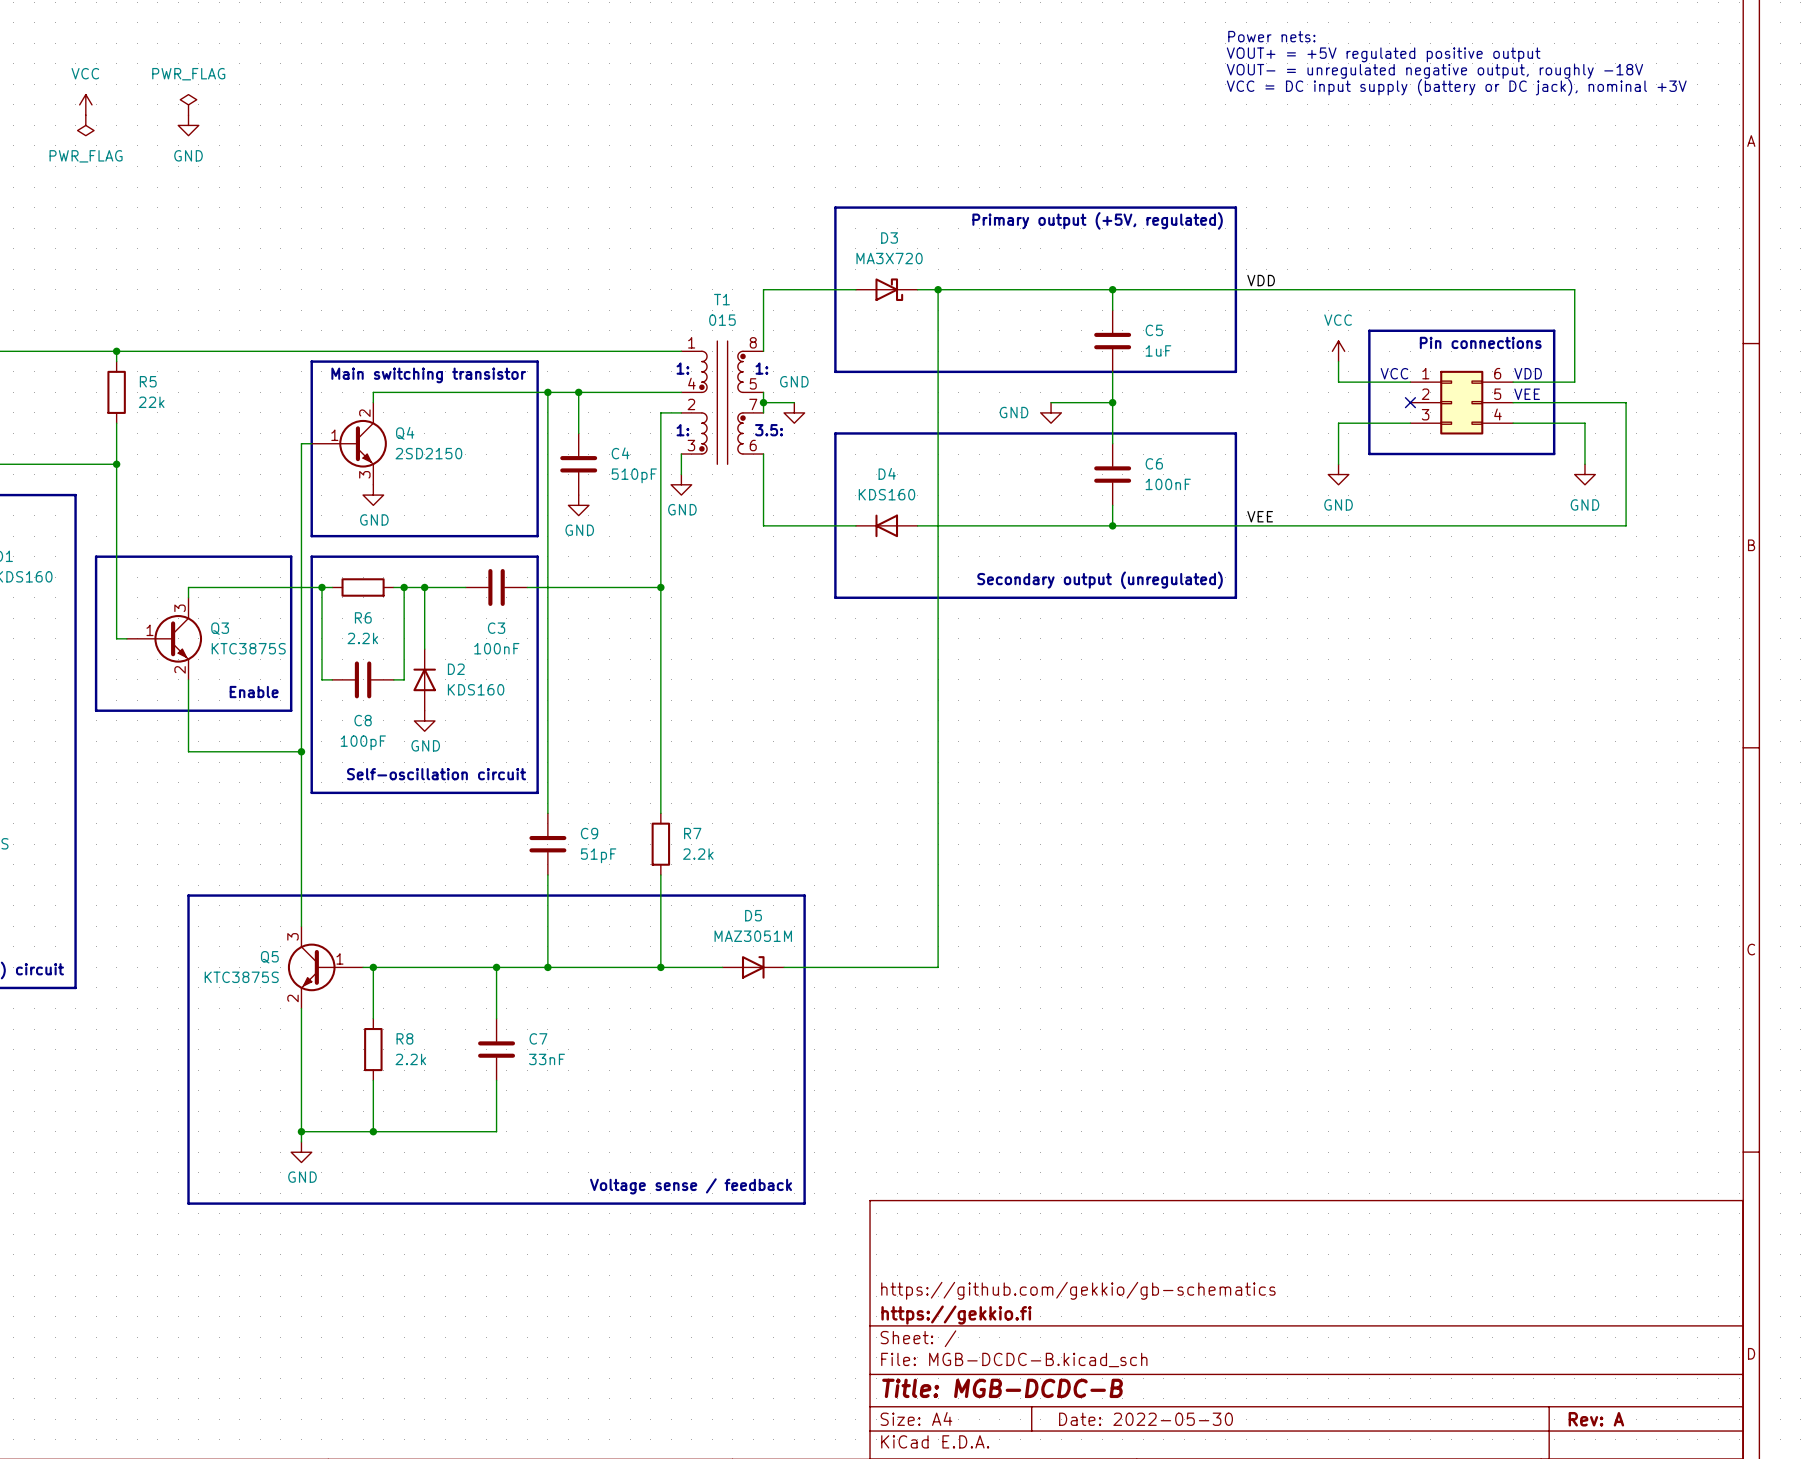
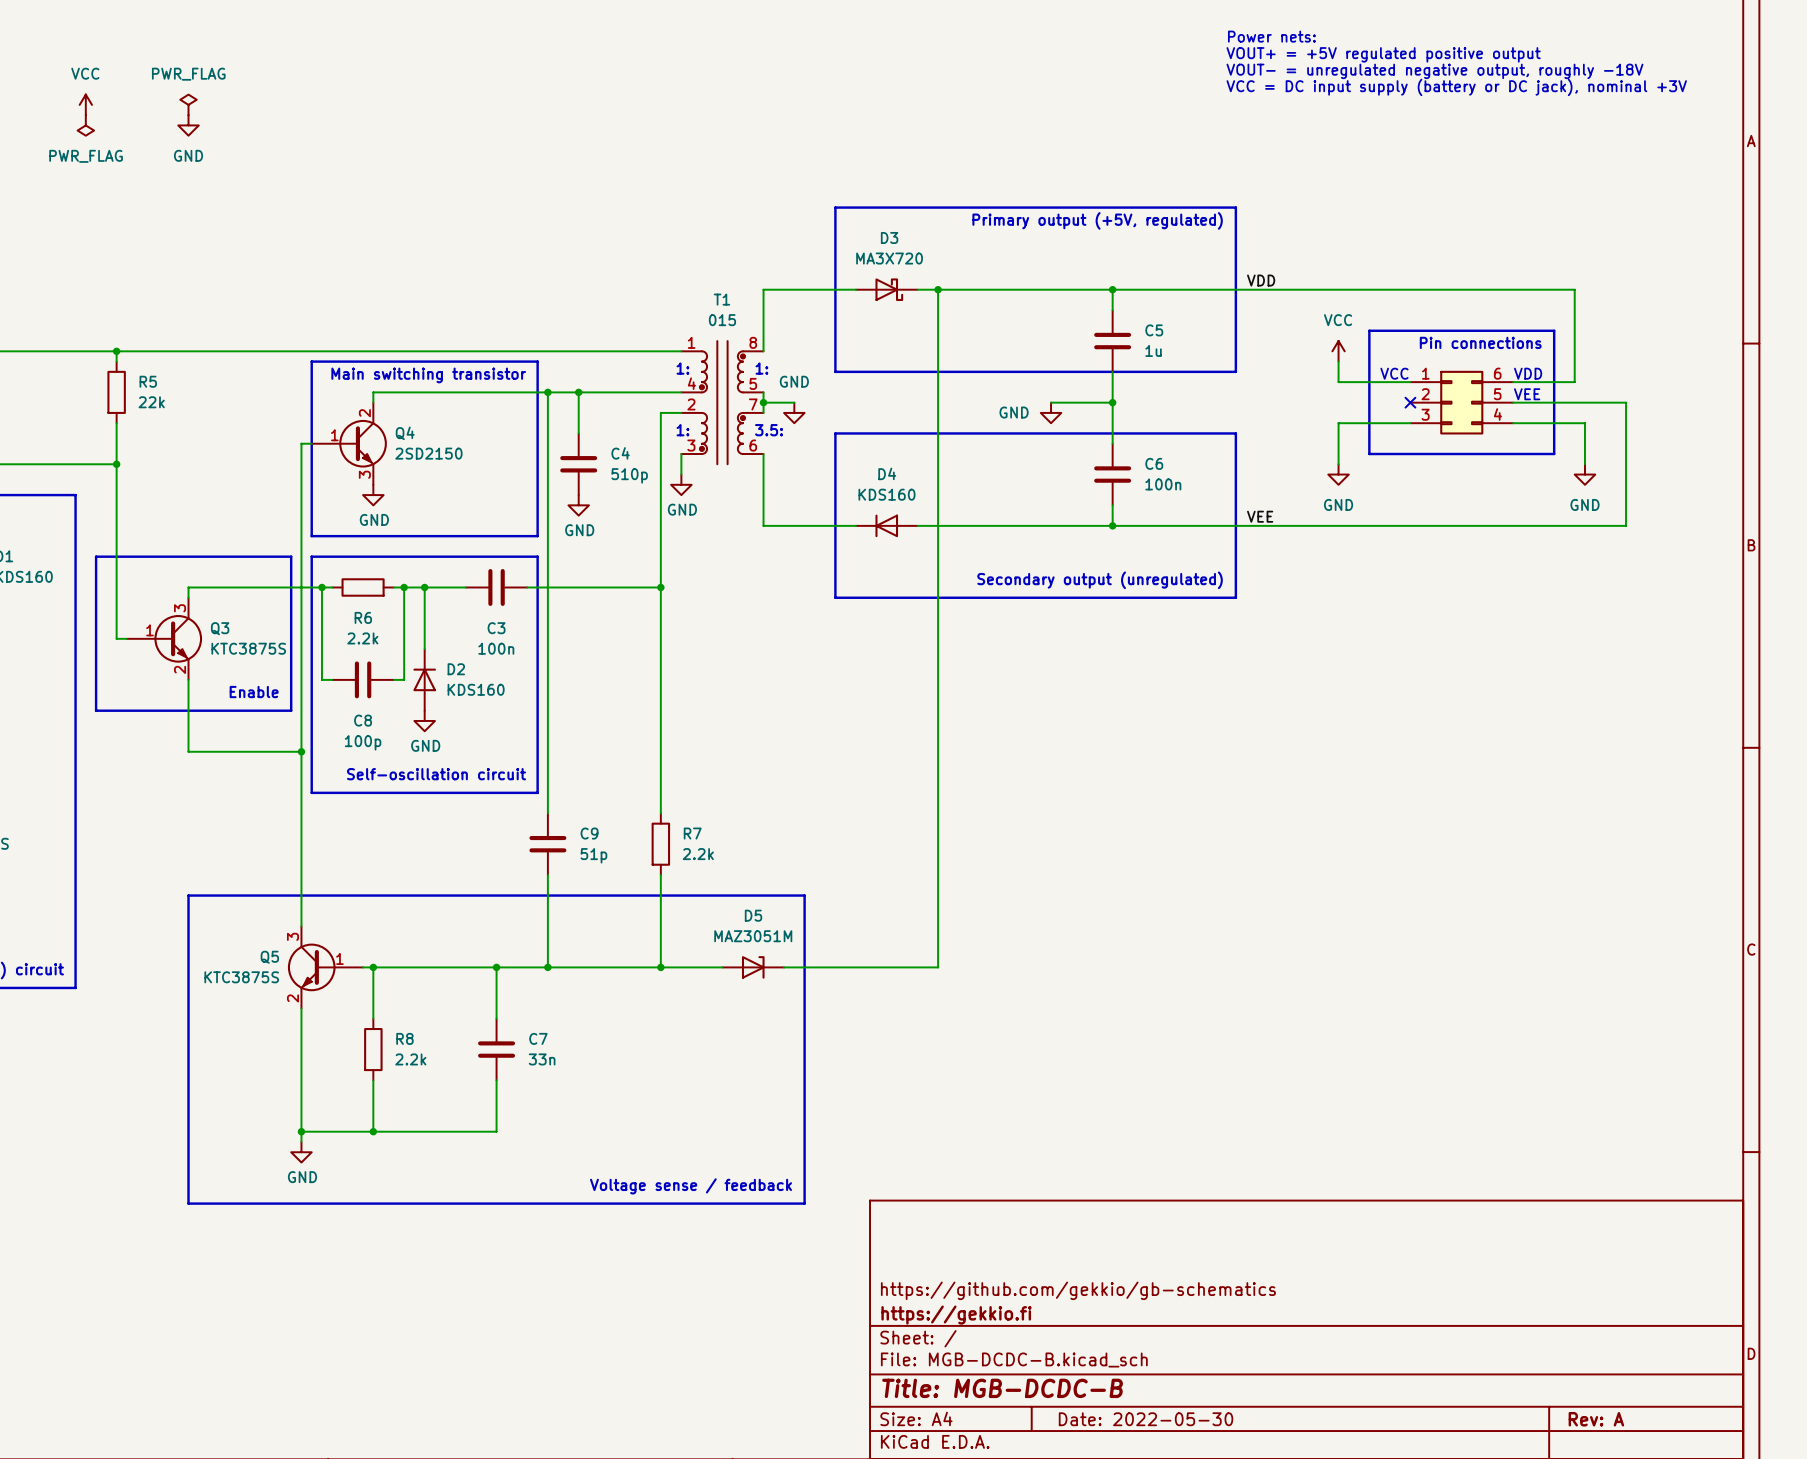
C5 value: 1uF (1158, 350) -> 1u (1153, 350)
C4 value: 510pF (634, 475) -> 510p (629, 475)
C6 value: 100nF (1168, 484) -> 100n (1163, 484)
C3 value: 100nF (496, 648) -> 100n (496, 648)
C8 value: 100pF (363, 742) -> 100p (363, 742)
C9 value: 51pF (598, 855) -> 51p (593, 855)
C7 value: 33nF (546, 1059) -> 33n (542, 1059)

